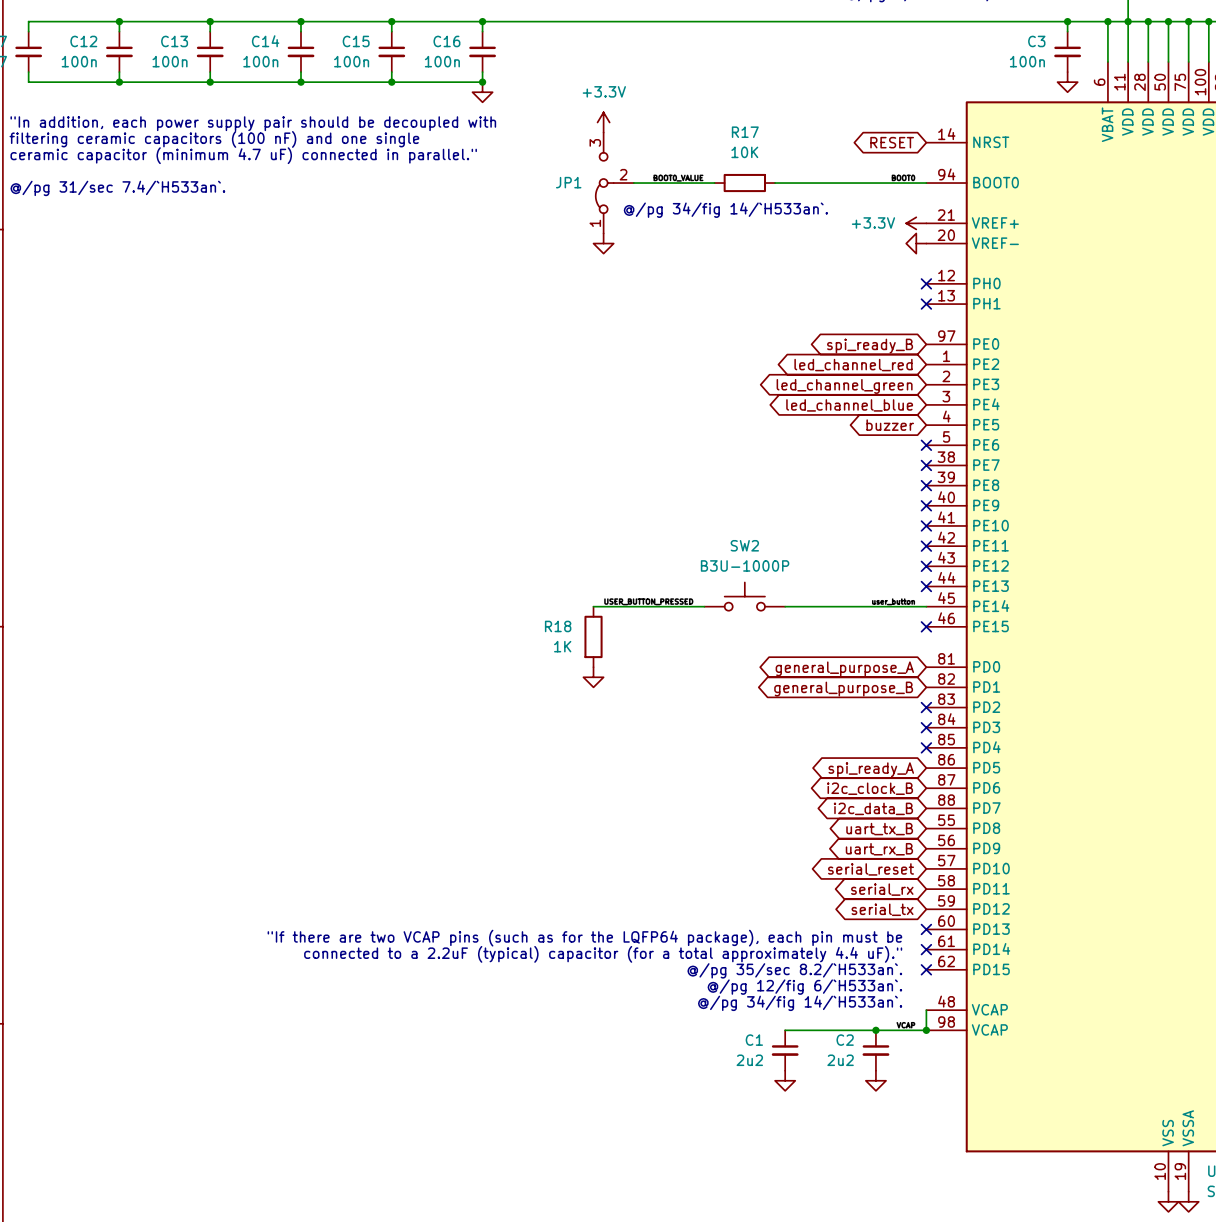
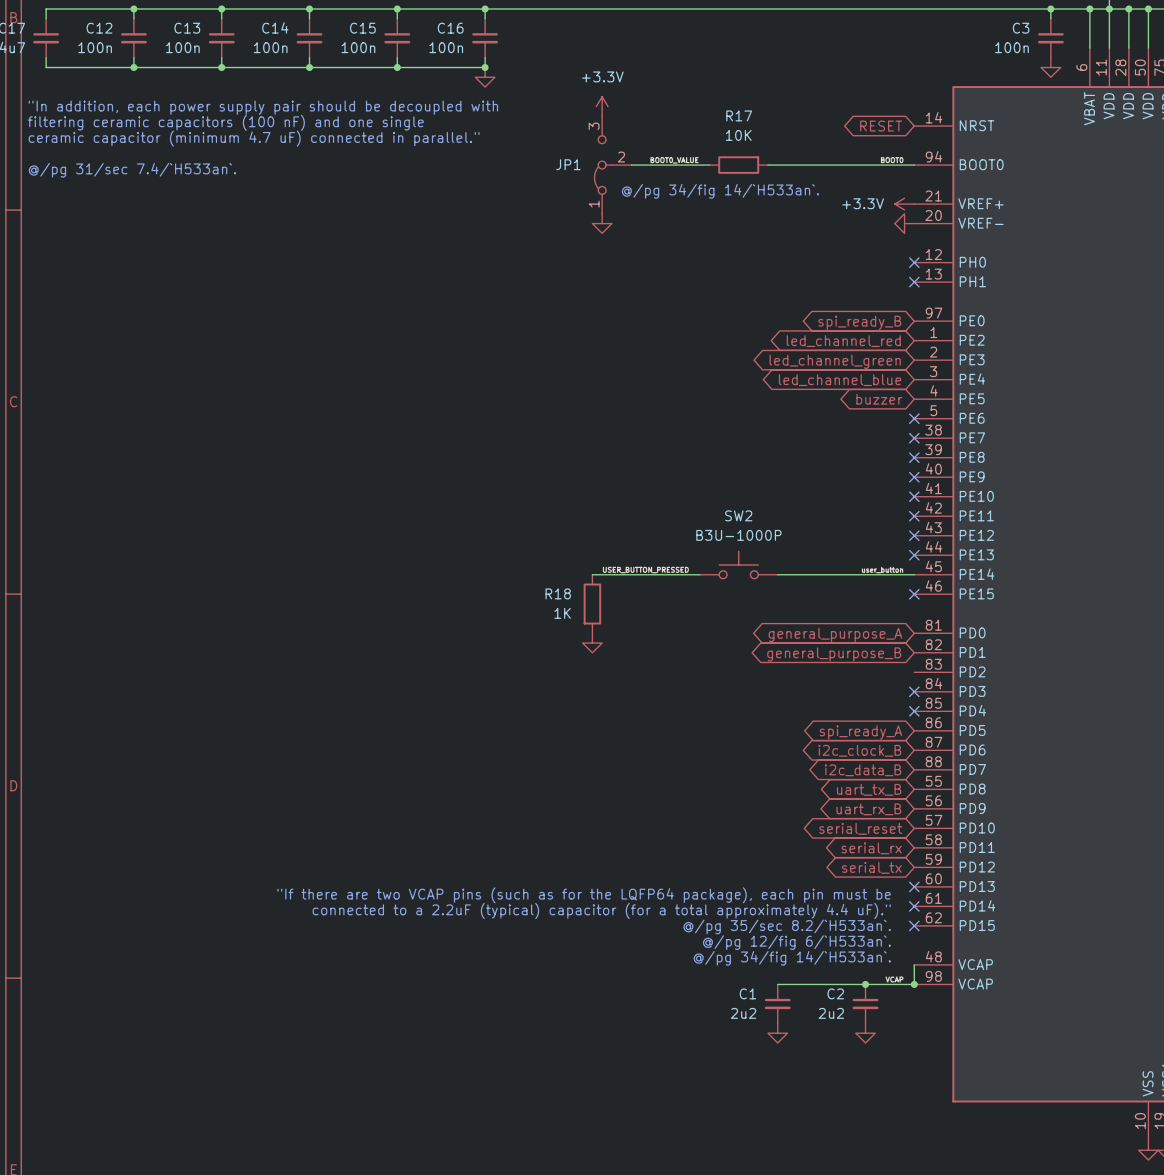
no-connect mark: (926, 707) -> none

